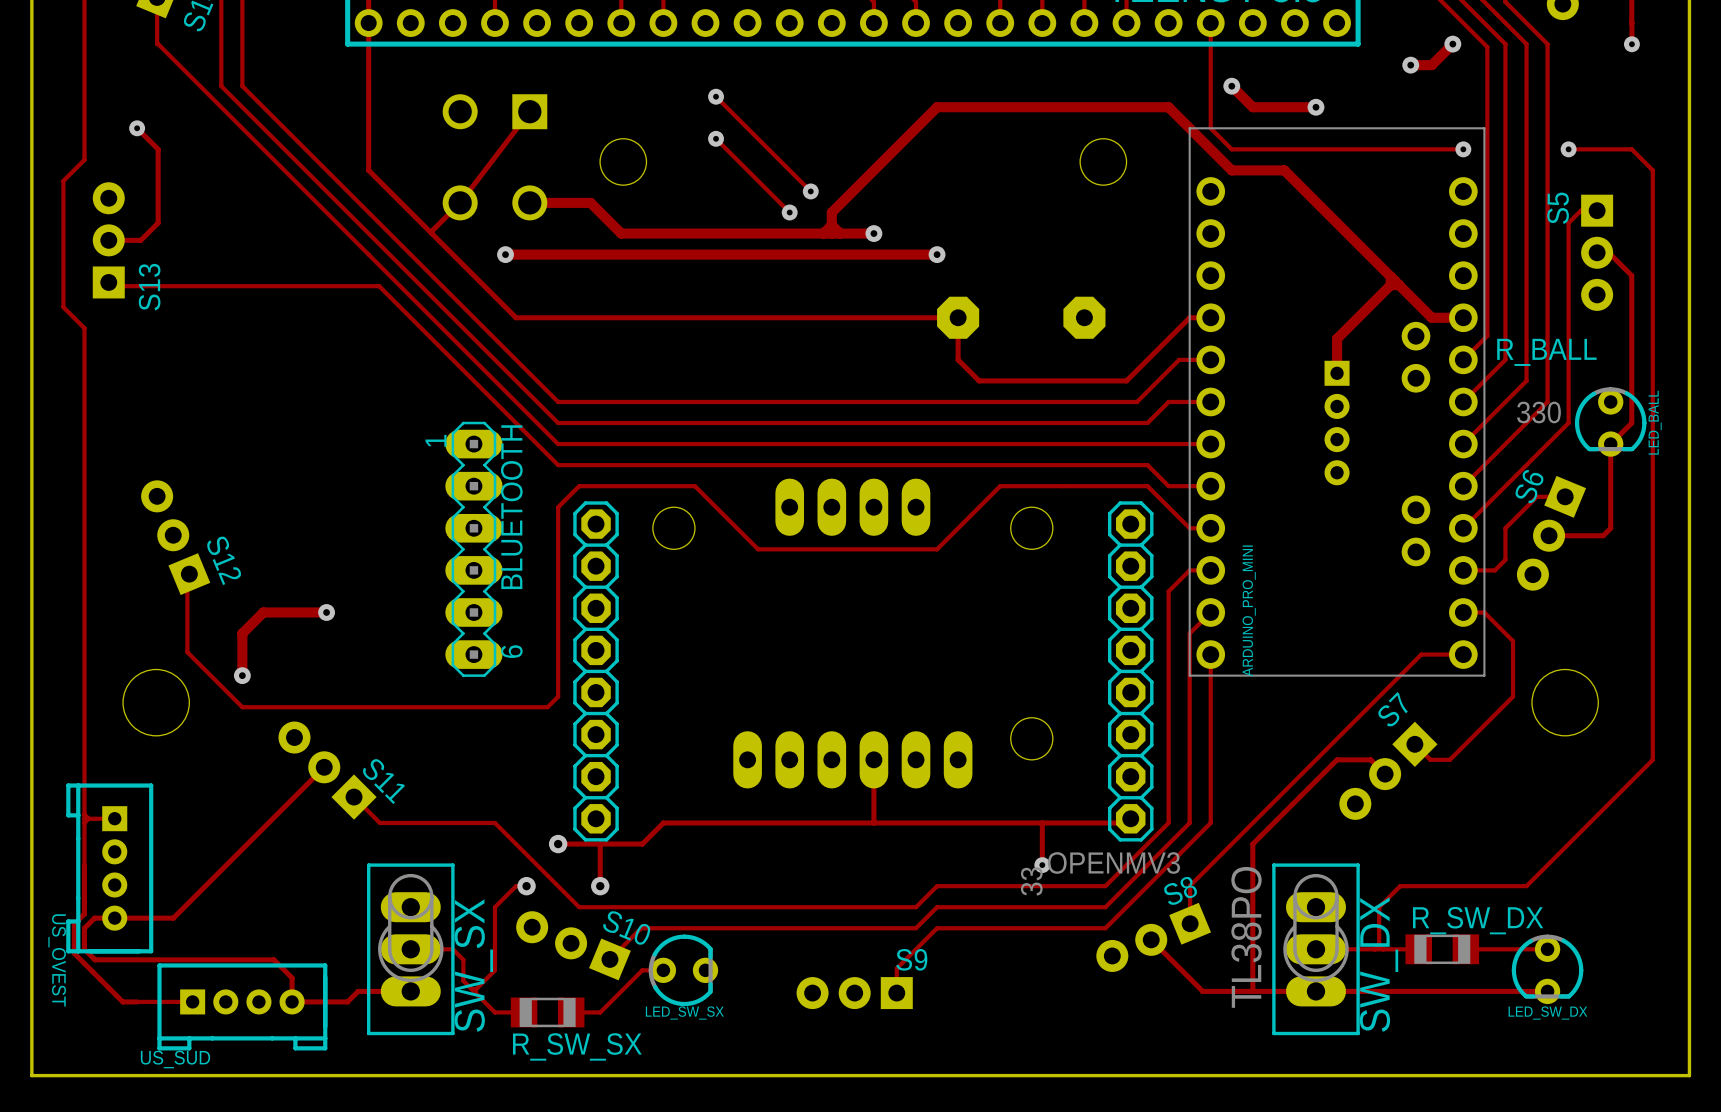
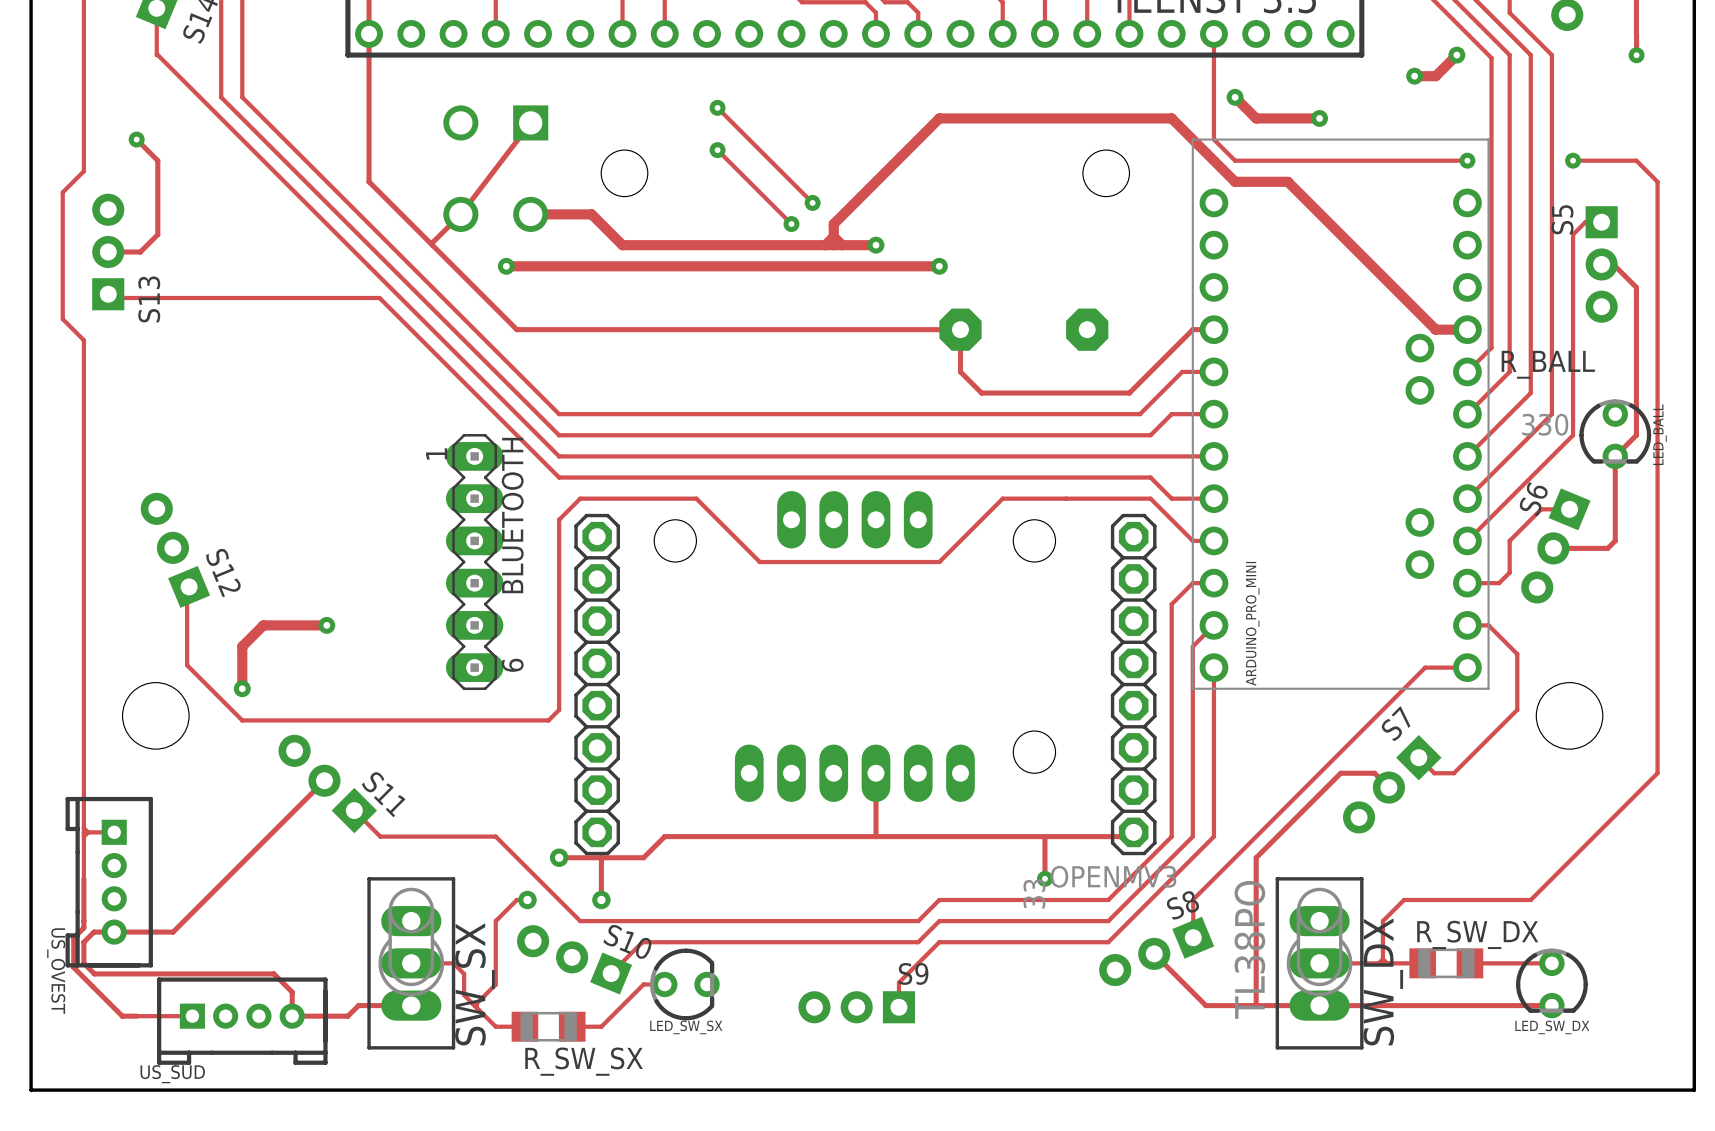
track: (1394, 280) (1337, 338) (1337, 373) -> none
part: (1337, 423) -> none

